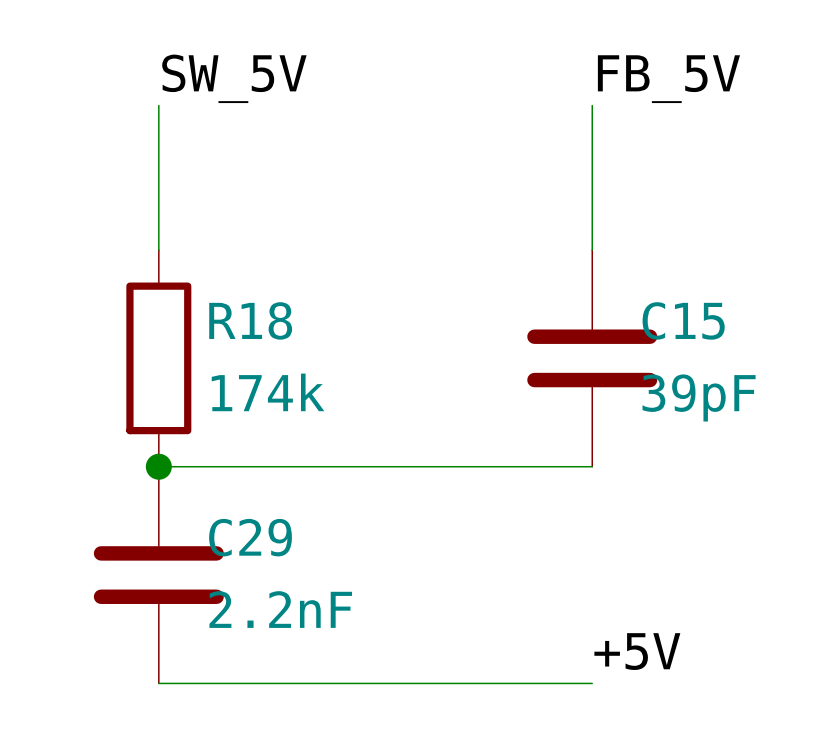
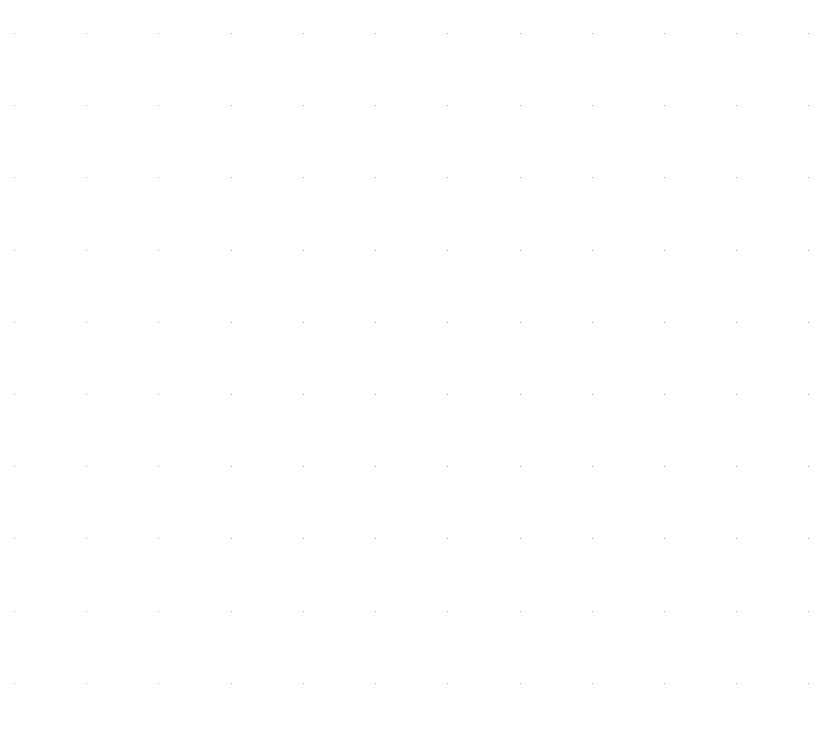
label: SW_5V (234, 78) -> none
label: FB_5V (668, 79) -> none
wire: (158, 105) (158, 250) -> none
wire: (592, 105) (592, 250) -> none
R18: 174k (158, 358) -> none
C15: 39pF (592, 358) -> none
wire: (158, 466) (592, 466) -> none
junction: (158, 466) -> none
C29: 2.2nF (158, 575) -> none
label: +5V (637, 651) -> none
wire: (158, 683) (592, 683) -> none

